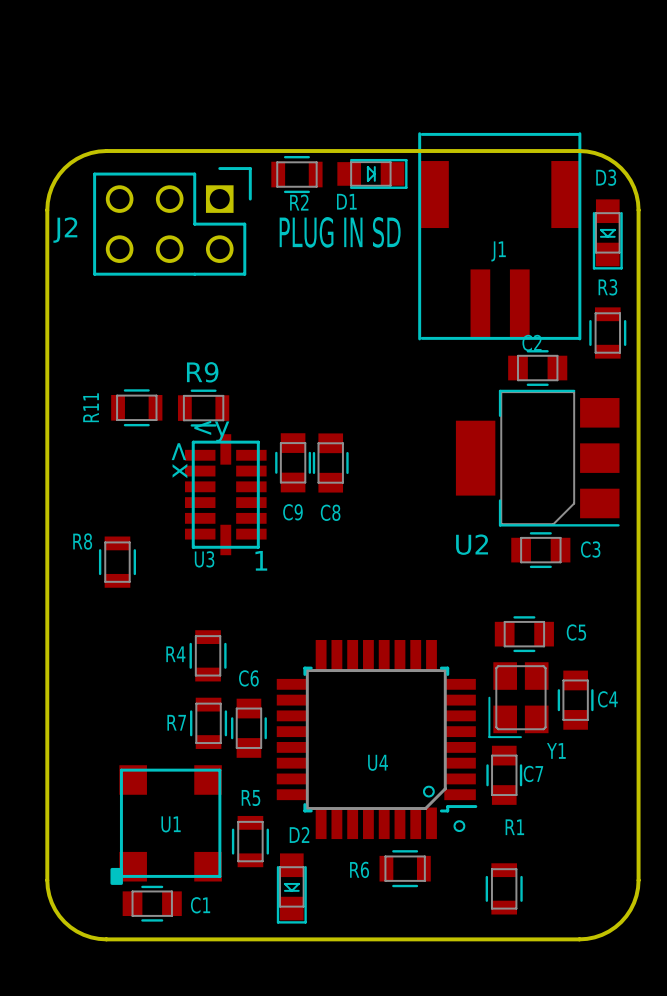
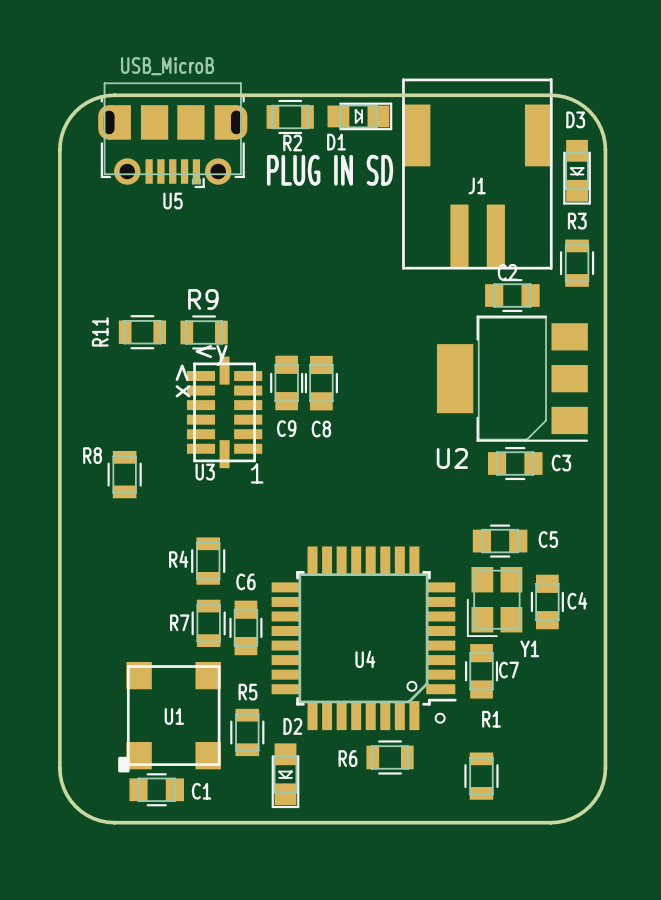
U5: none -> USB_MicroB (172, 135)
J2: (172, 221) -> none

